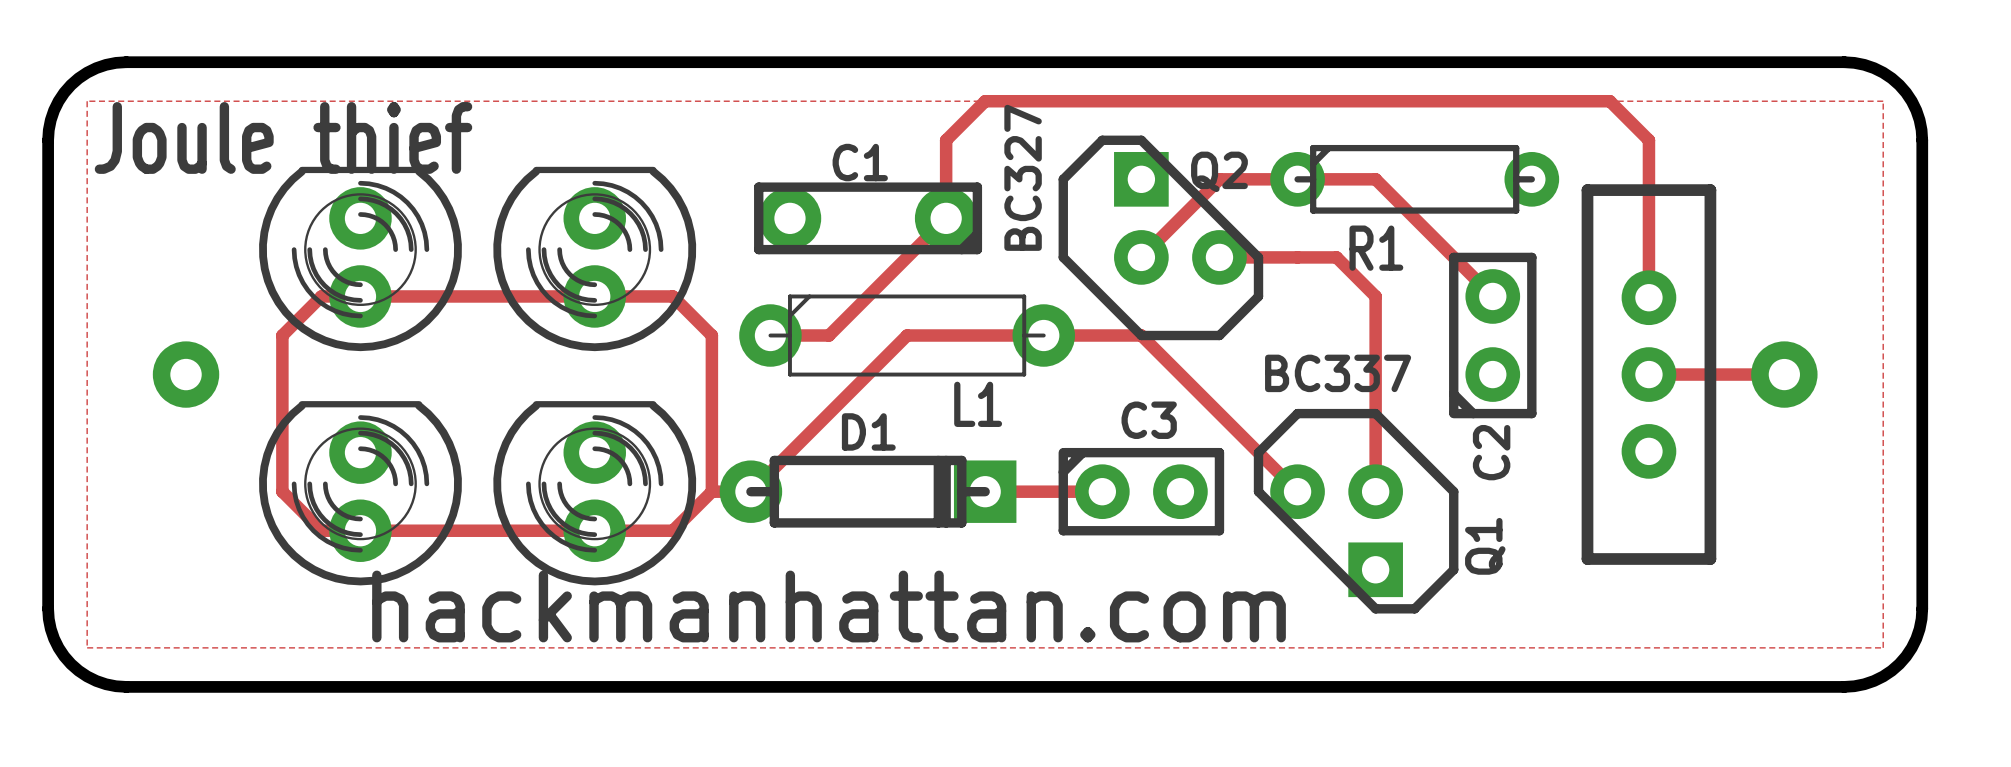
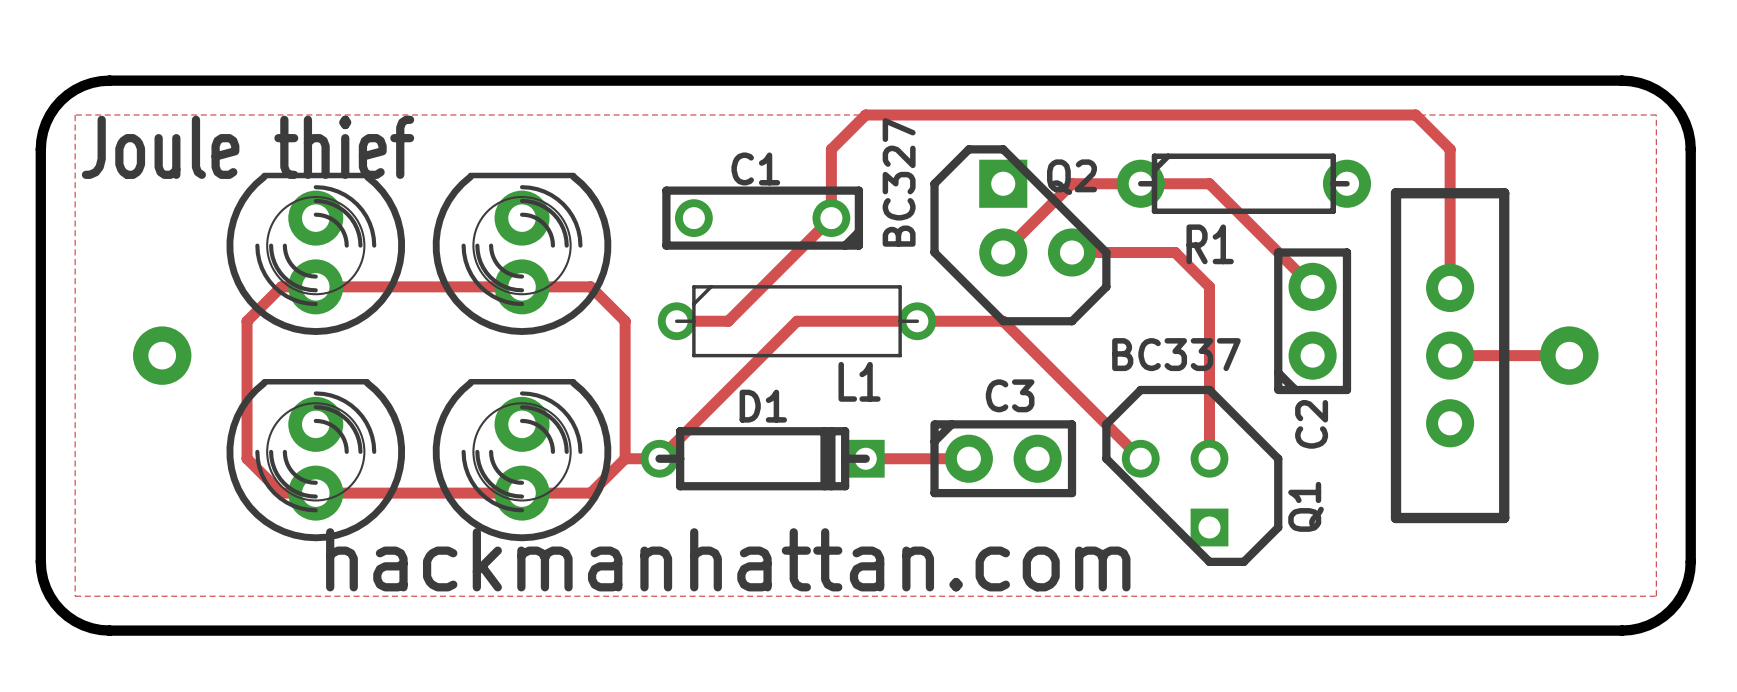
C1 footprint: [754, 182, 983, 255] -> [662, 186, 864, 250]
L1 footprint: [739, 294, 1075, 377] -> [657, 285, 937, 358]
Q1 footprint: [1253, 408, 1459, 614] -> [1102, 385, 1283, 566]
D1 footprint: [719, 455, 1017, 528] -> [640, 427, 885, 491]

